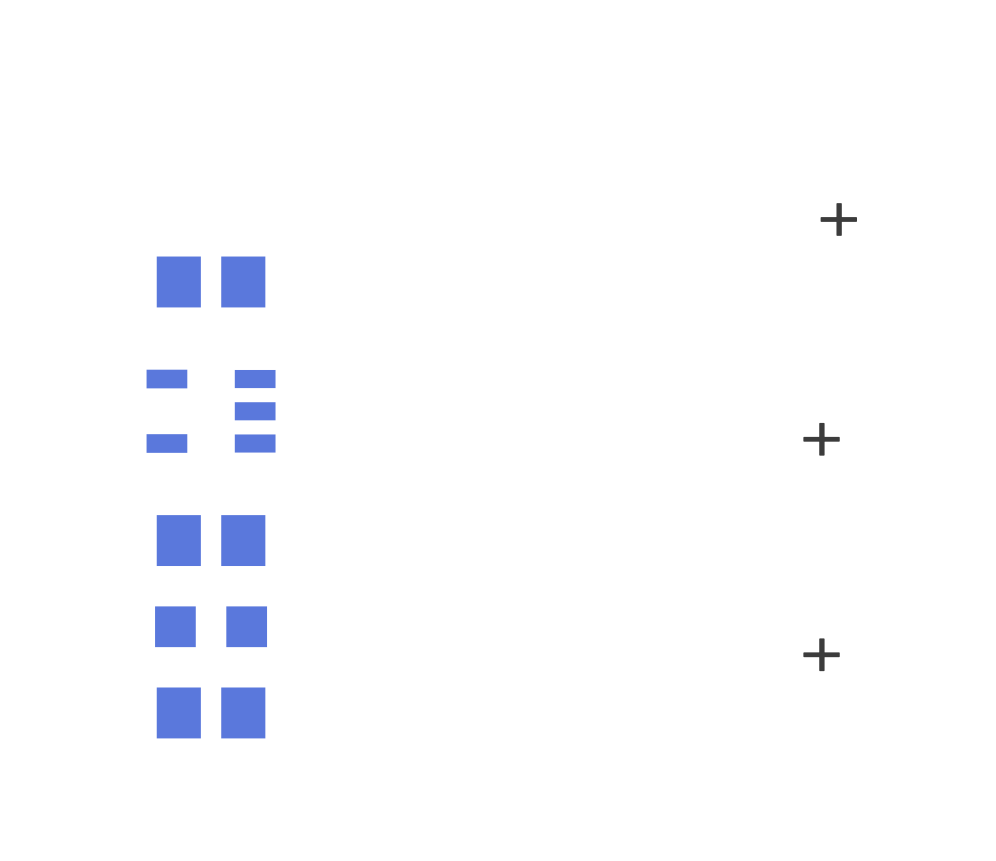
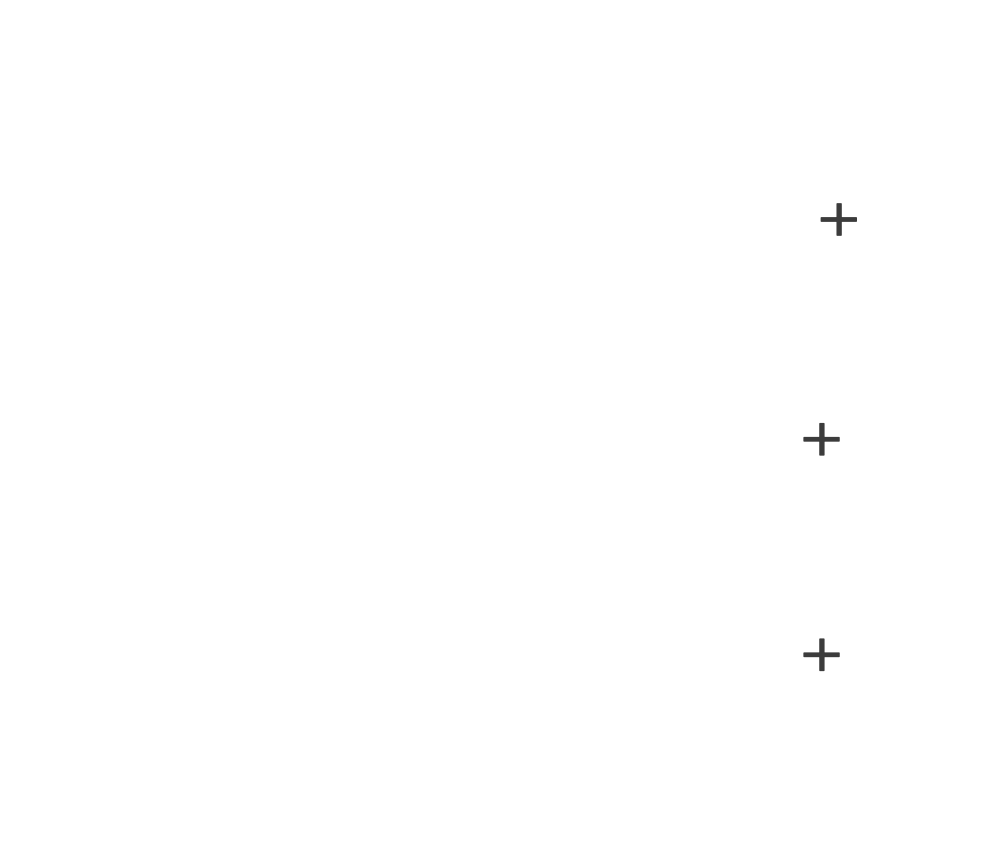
part: (211, 281) -> none
part: (211, 411) -> none
part: (211, 540) -> none
part: (211, 626) -> none
part: (211, 712) -> none

